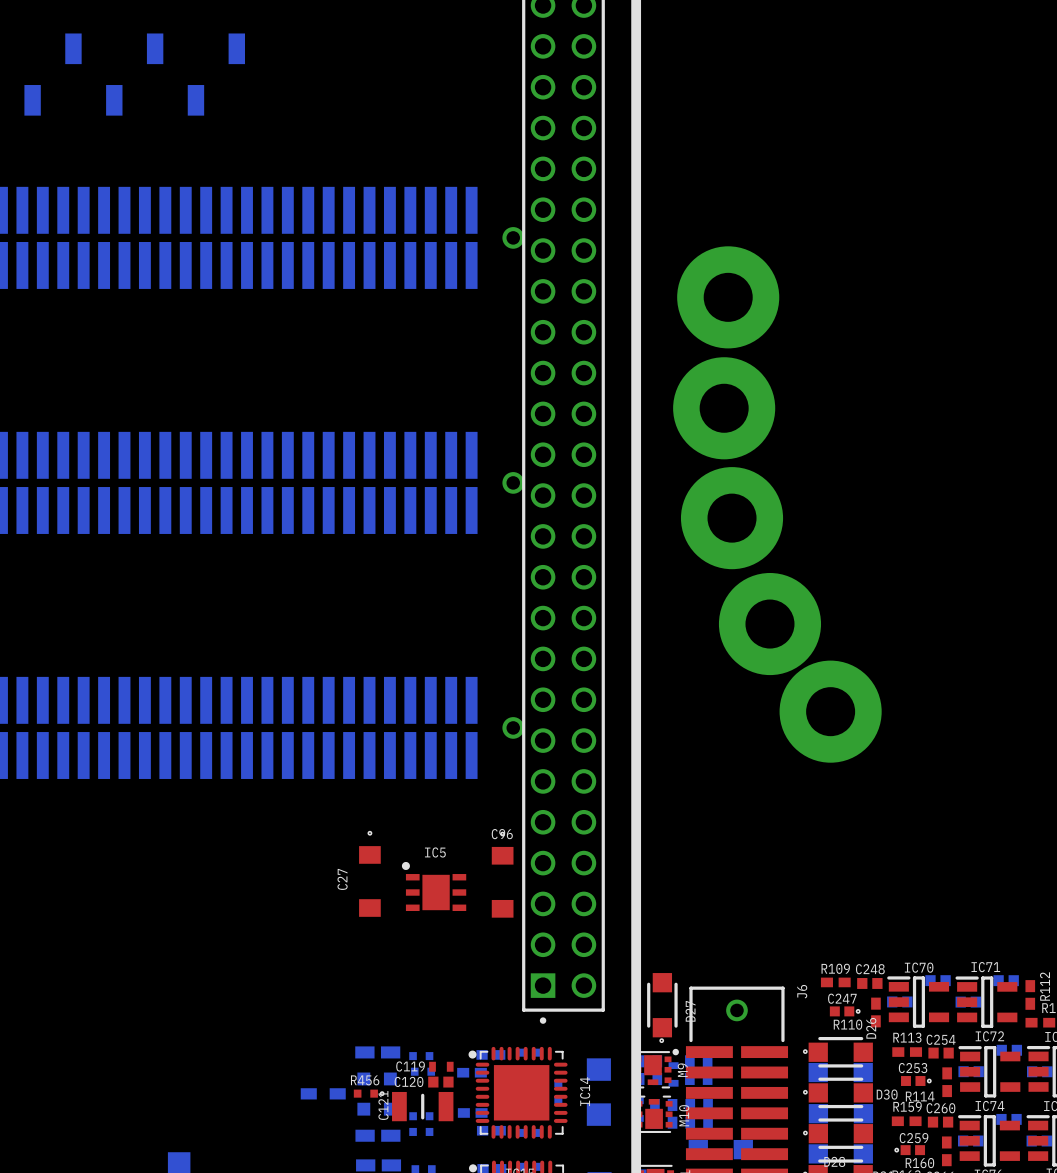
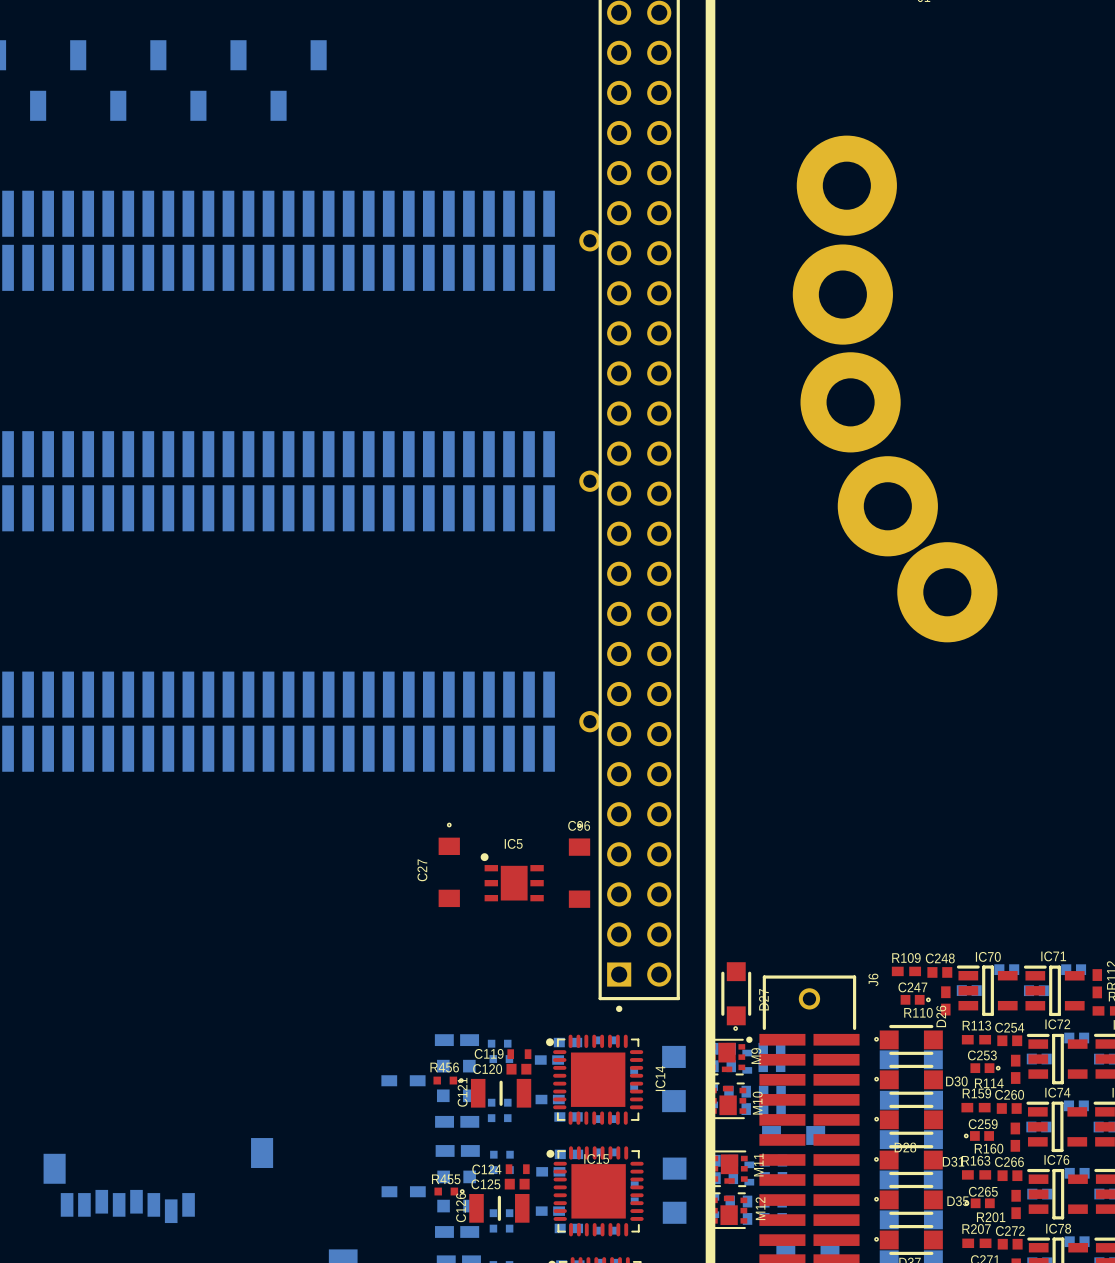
part: none -> (846, 185)
part position: (728, 297) -> (842, 294)
part position: (724, 408) -> (850, 402)
part: none -> (887, 506)
part: (732, 518) -> none
part: none -> (947, 592)
part: (769, 624) -> none
part: (830, 711) -> none

